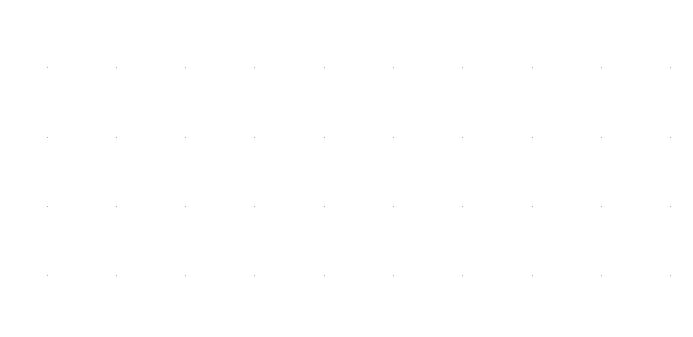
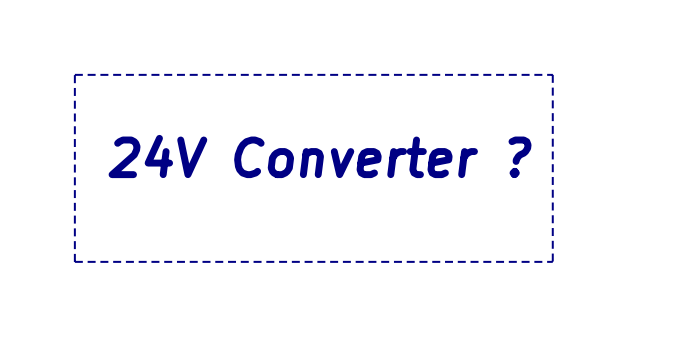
line: none -> (74, 74) (74, 261) (552, 261) (552, 74) (74, 74)
text: none -> 24V Converter ? (320, 156)

